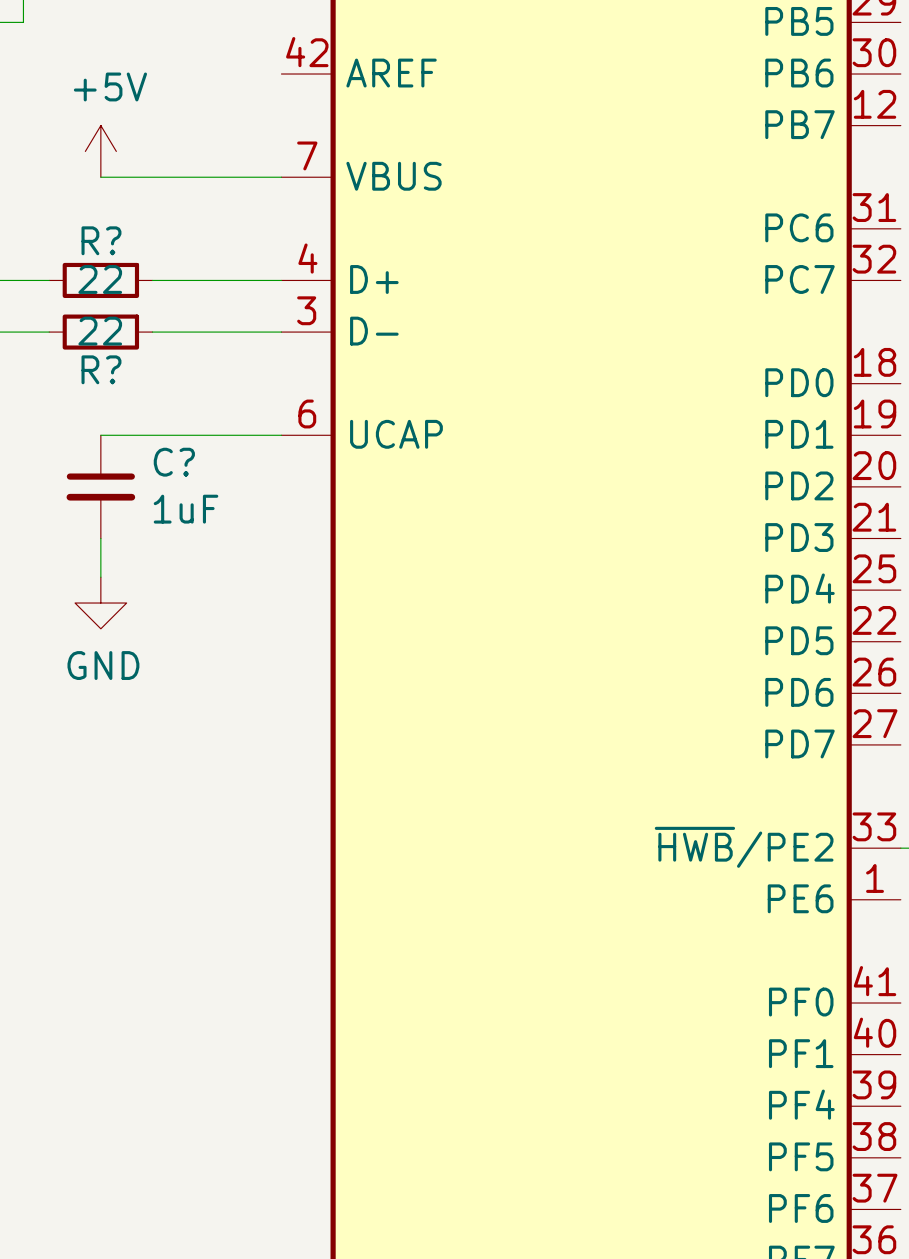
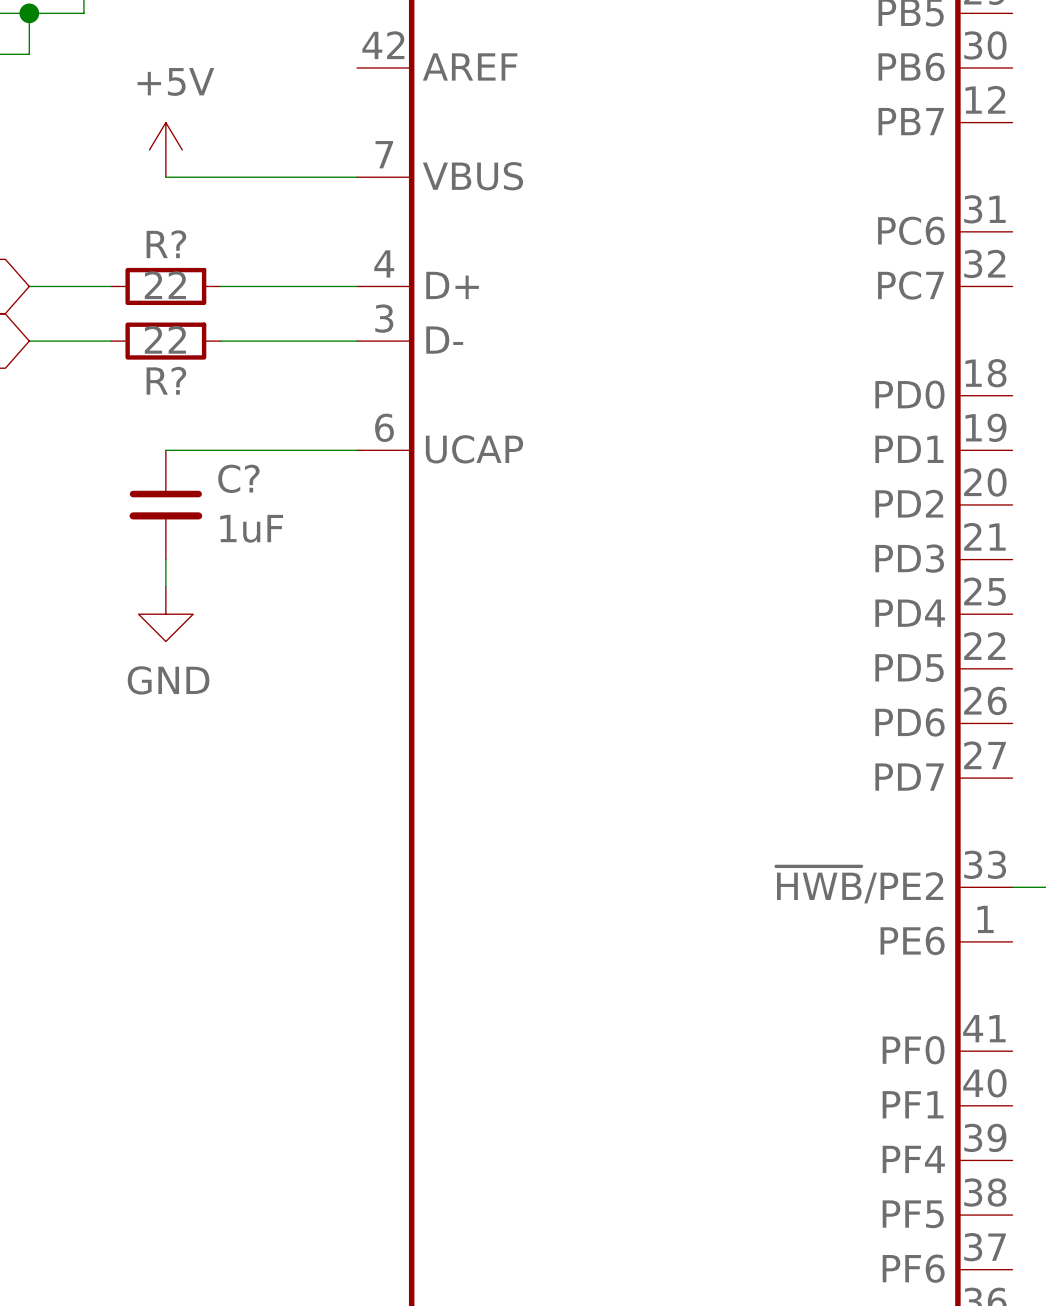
power symbol position: GND (100, 603) -> GND (165, 614)

